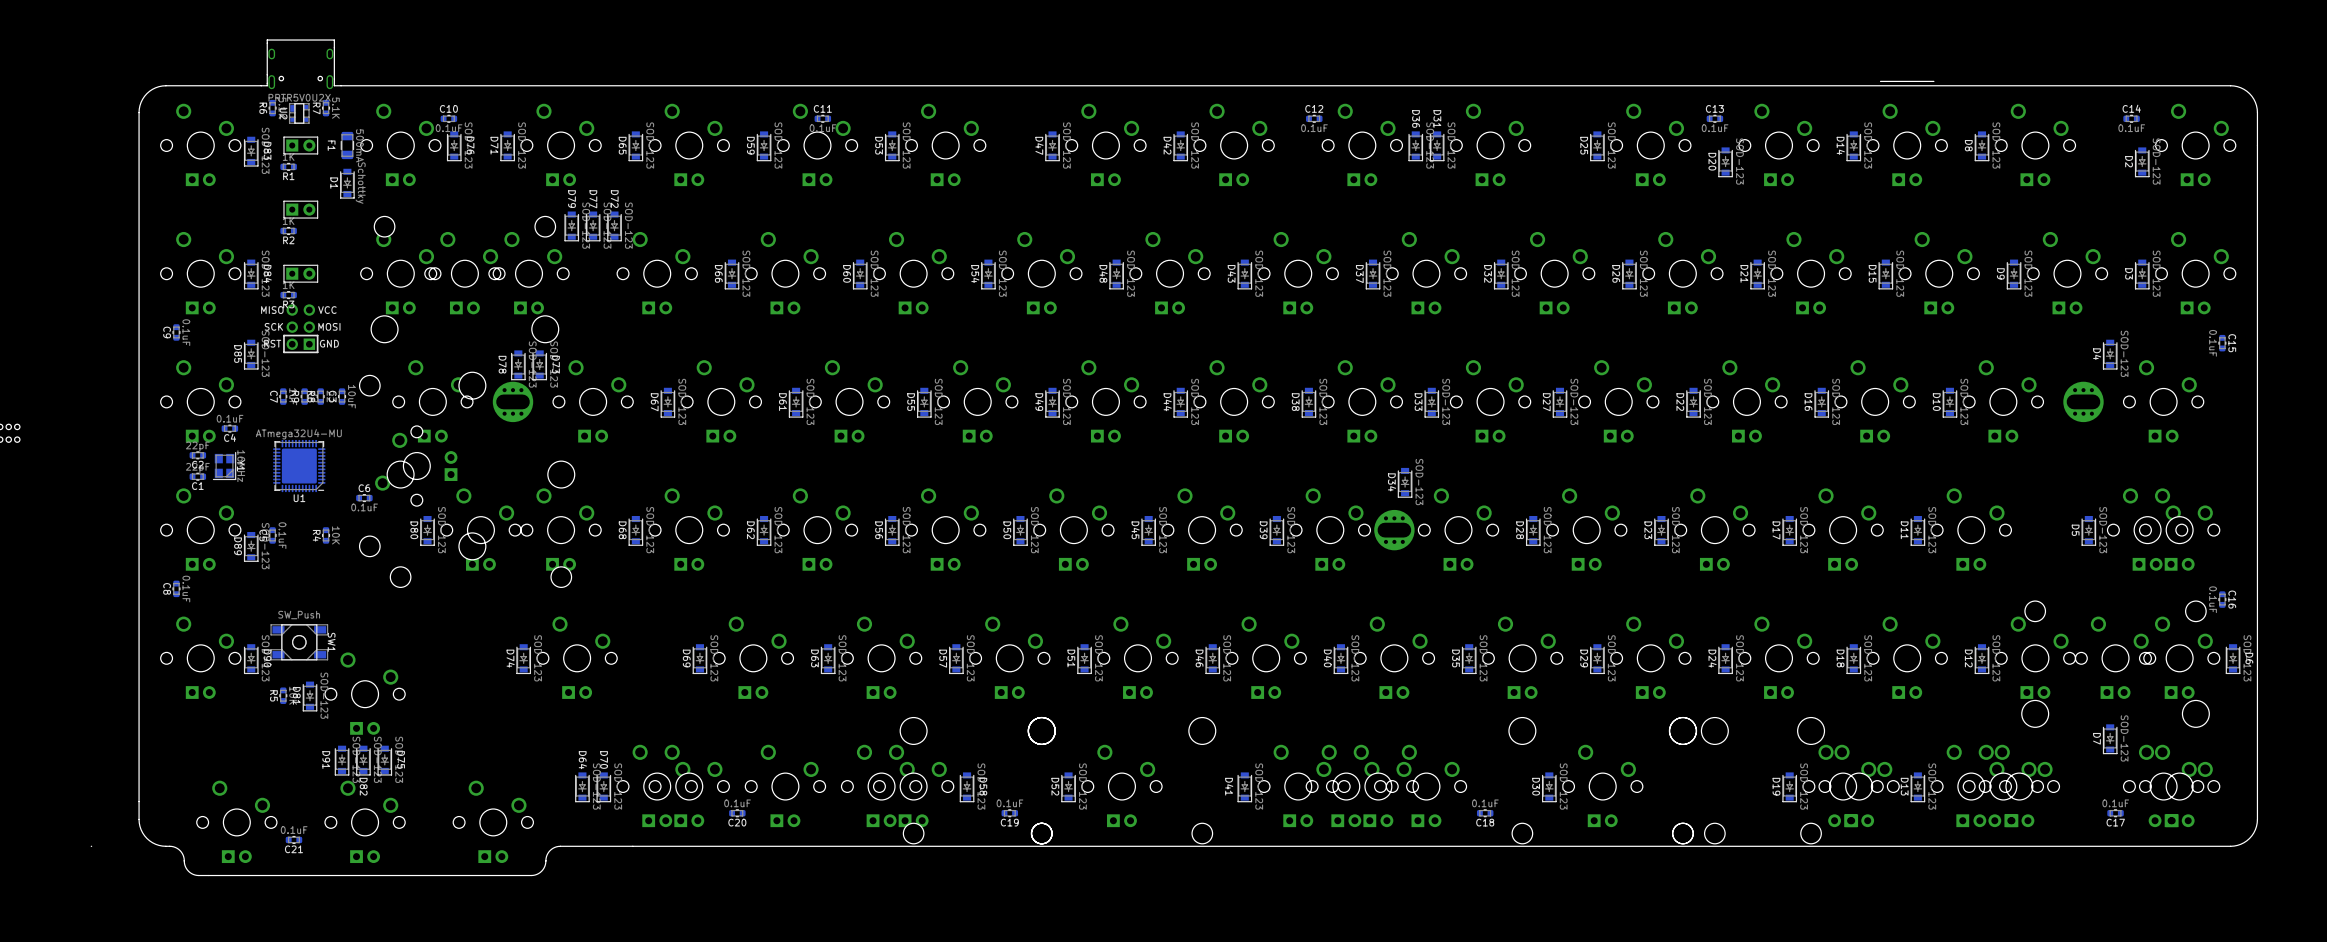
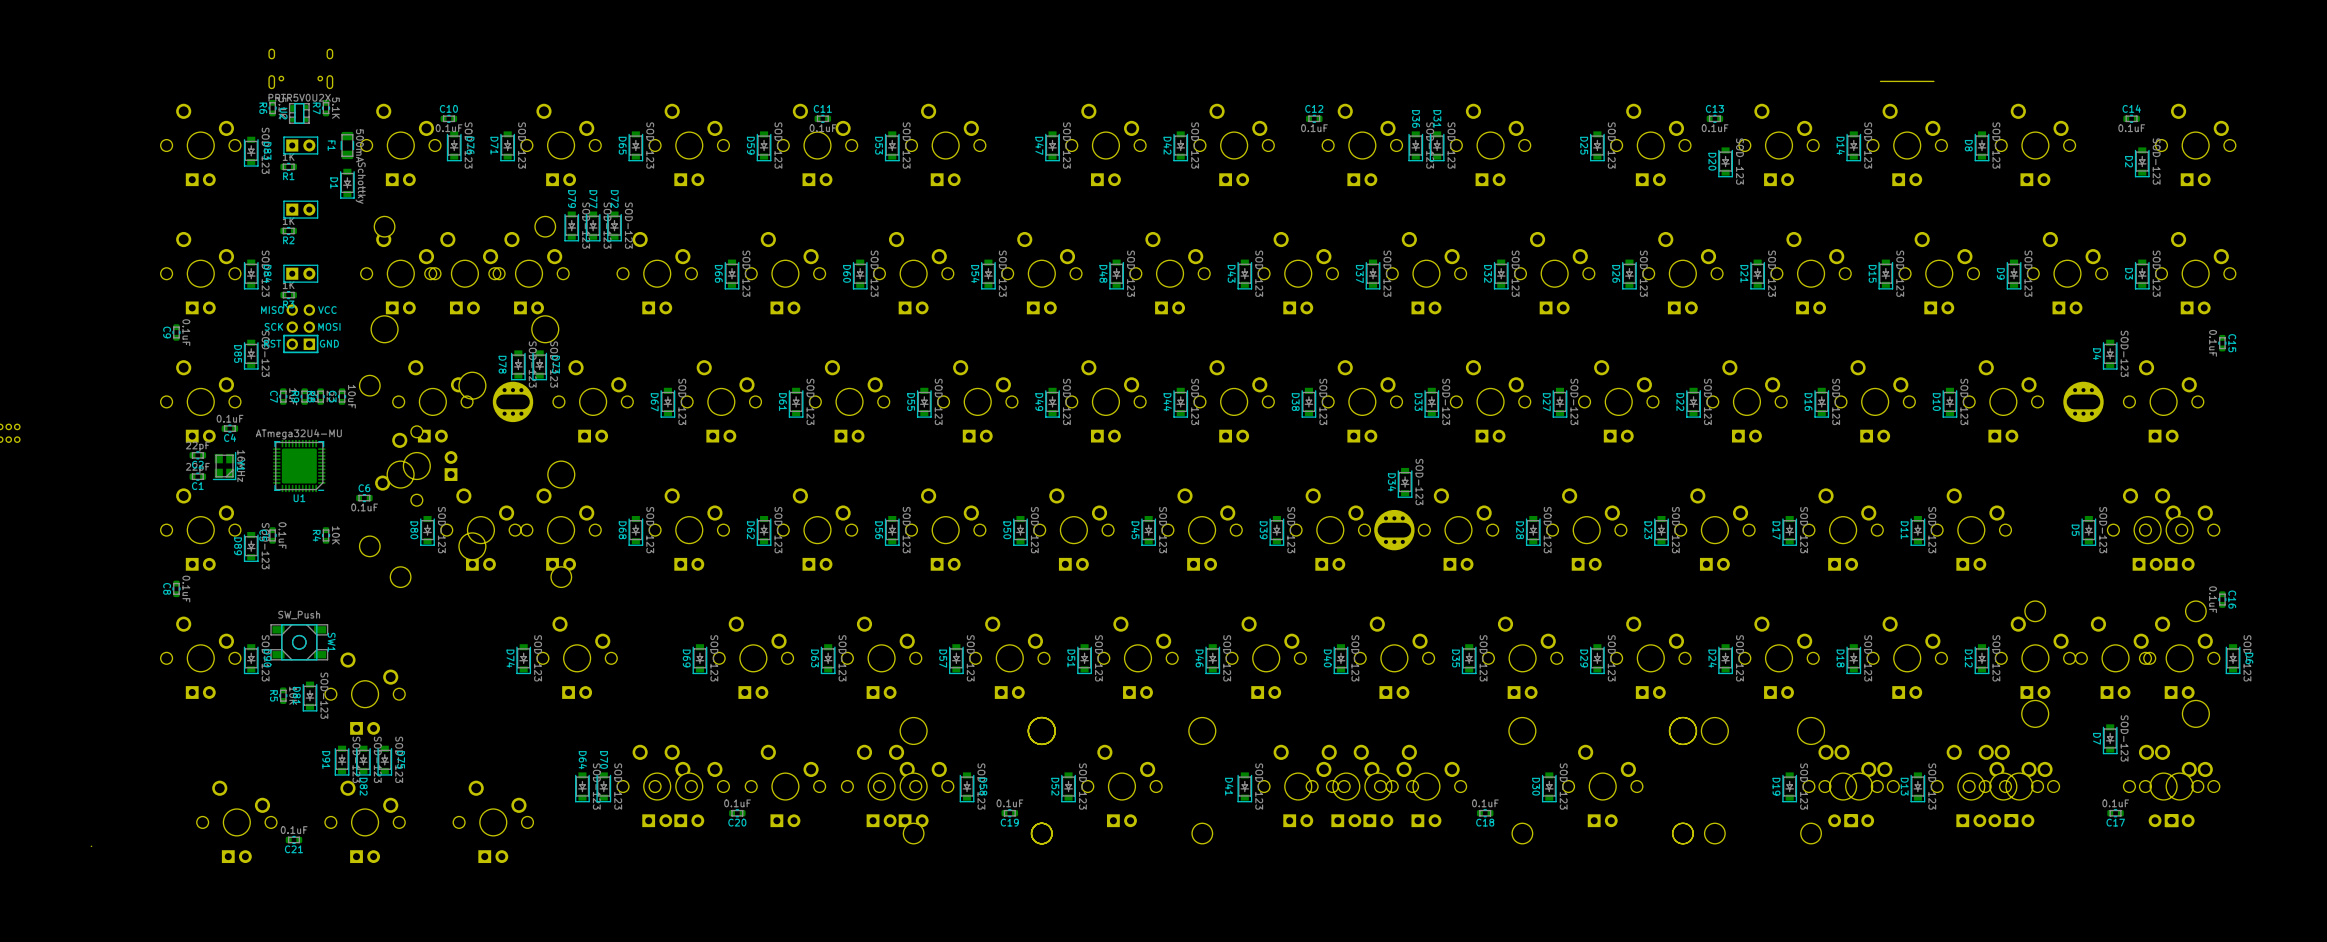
board edge: (334, 40) (334, 85) (2230, 85) (2240, 87) (2251, 96) (2257, 112) (2257, 819) (2255, 829) (2246, 840) (2230, 846) (560, 846) (550, 850) (542, 869) (533, 875) (193, 874) (186, 868) (180, 850) (173, 846) (158, 845) (149, 840) (142, 832) (139, 822) (139, 109) (146, 93) (162, 85) (267, 85) (267, 40) (334, 40) -> none

